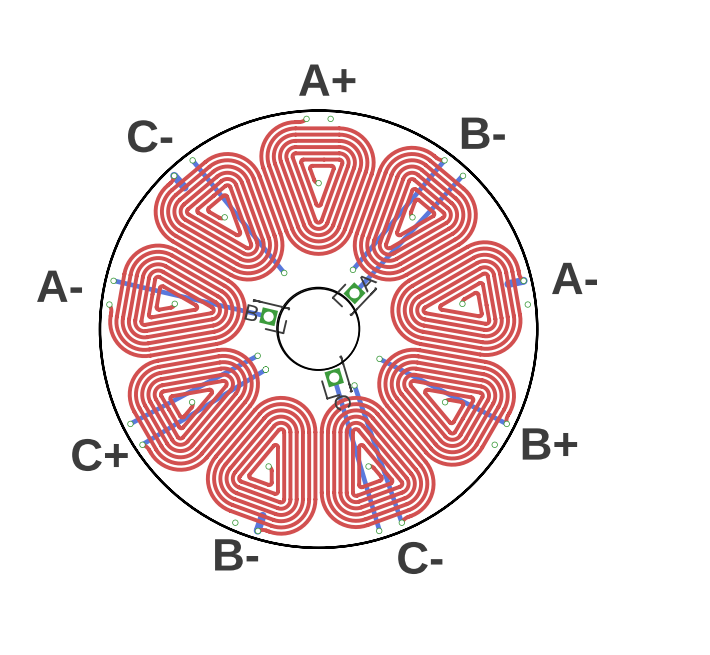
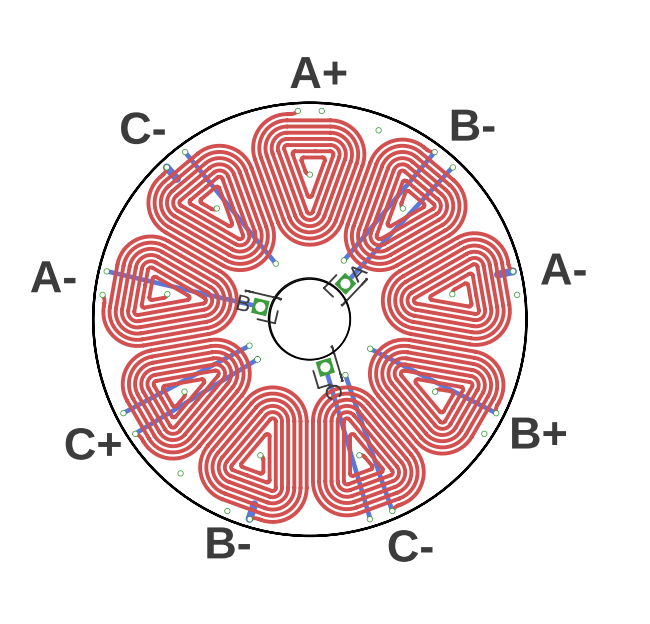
via: none -> (378, 130)
via: none -> (180, 473)

